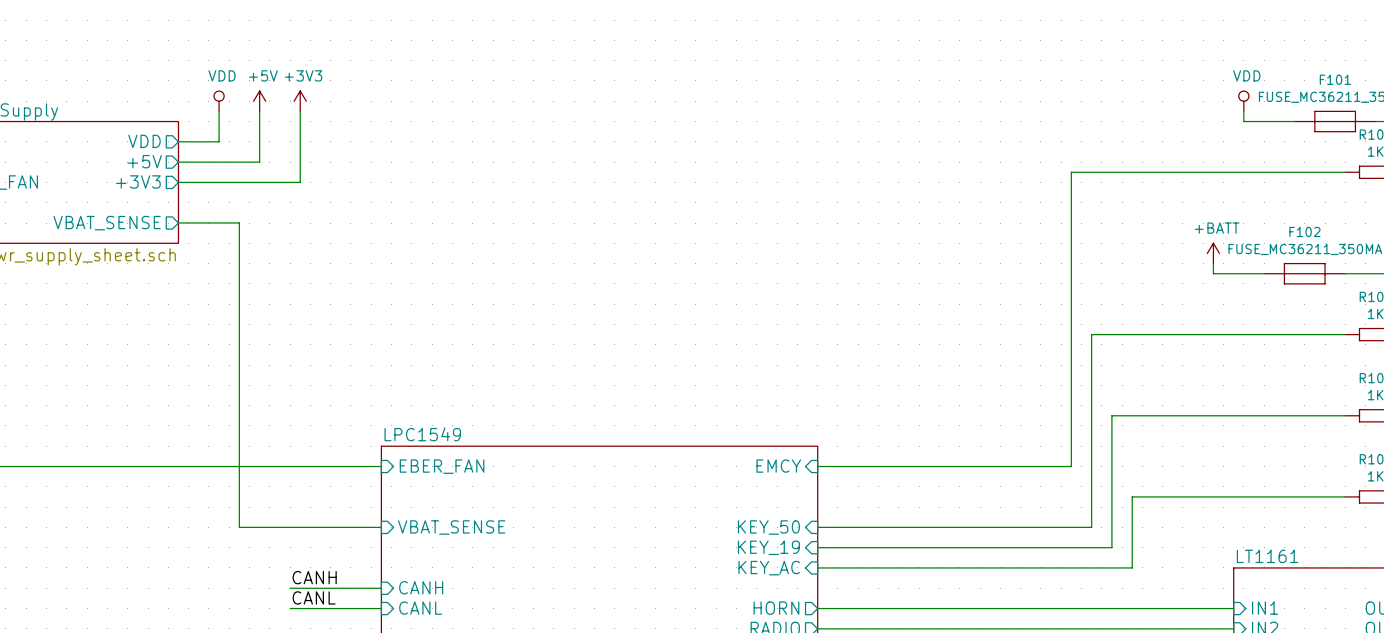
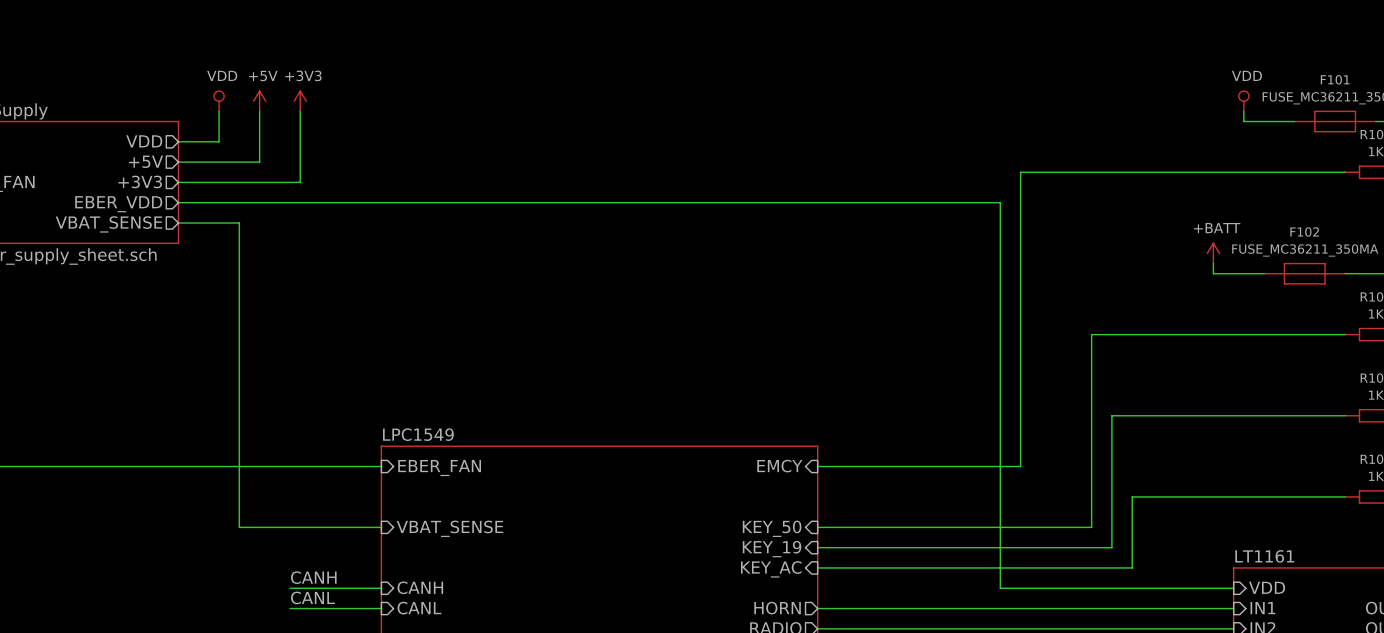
wire: (1071, 172) (1071, 466) (1020, 466) -> (1071, 172) (1020, 172) (1020, 466)
sheet pin: none -> EBER_VDD (118, 204)
wire: none -> (178, 202) (1000, 202) (1000, 588) (1233, 588)
sheet pin: none -> VDD (1267, 587)

